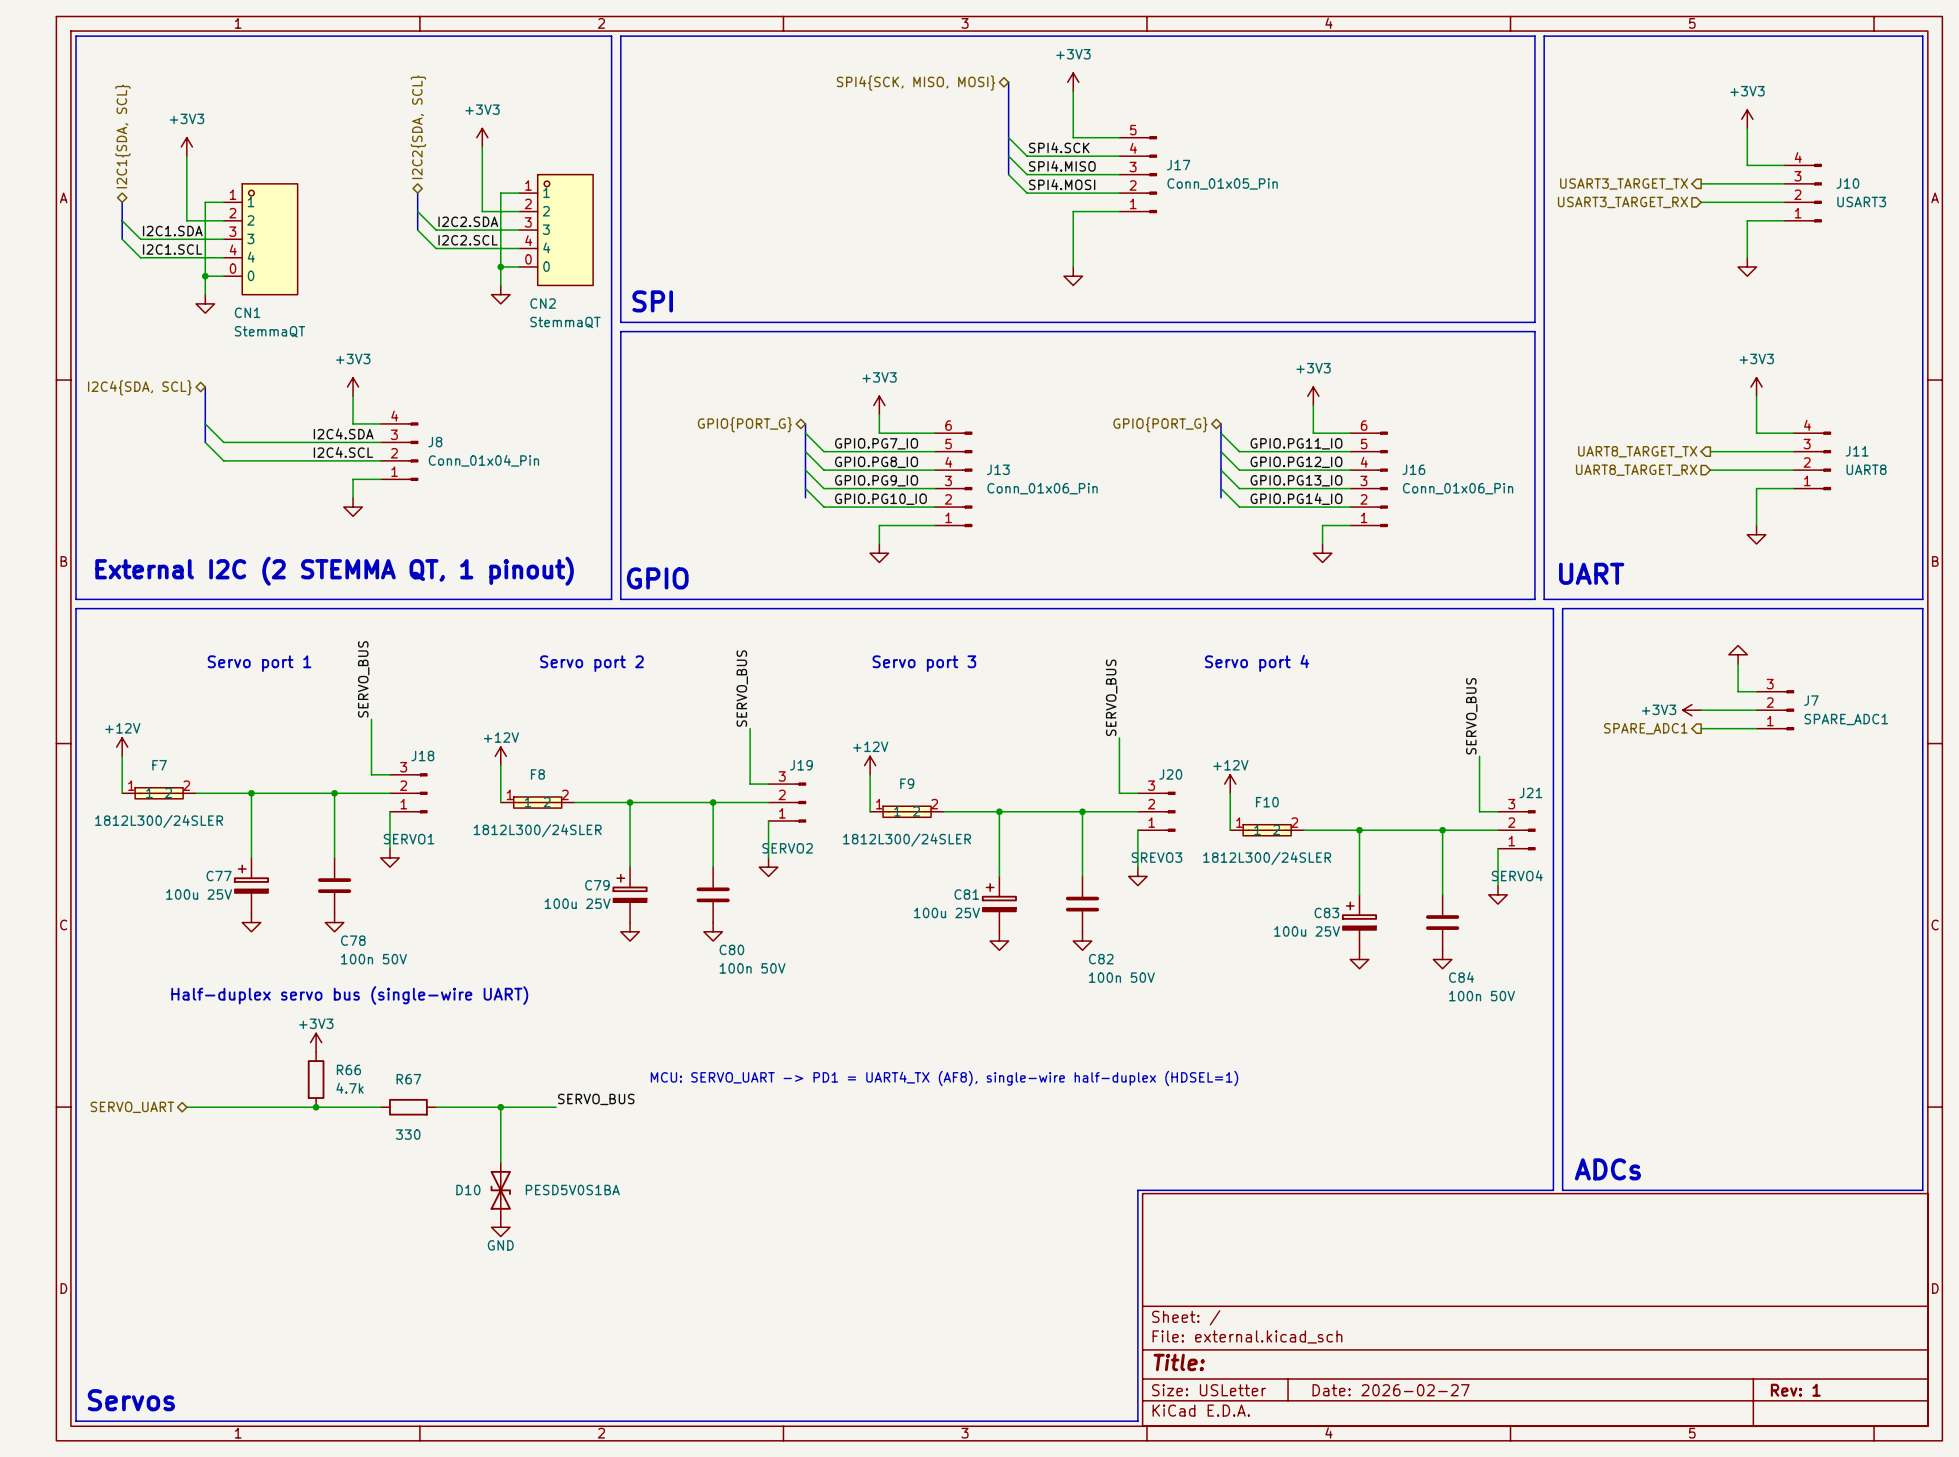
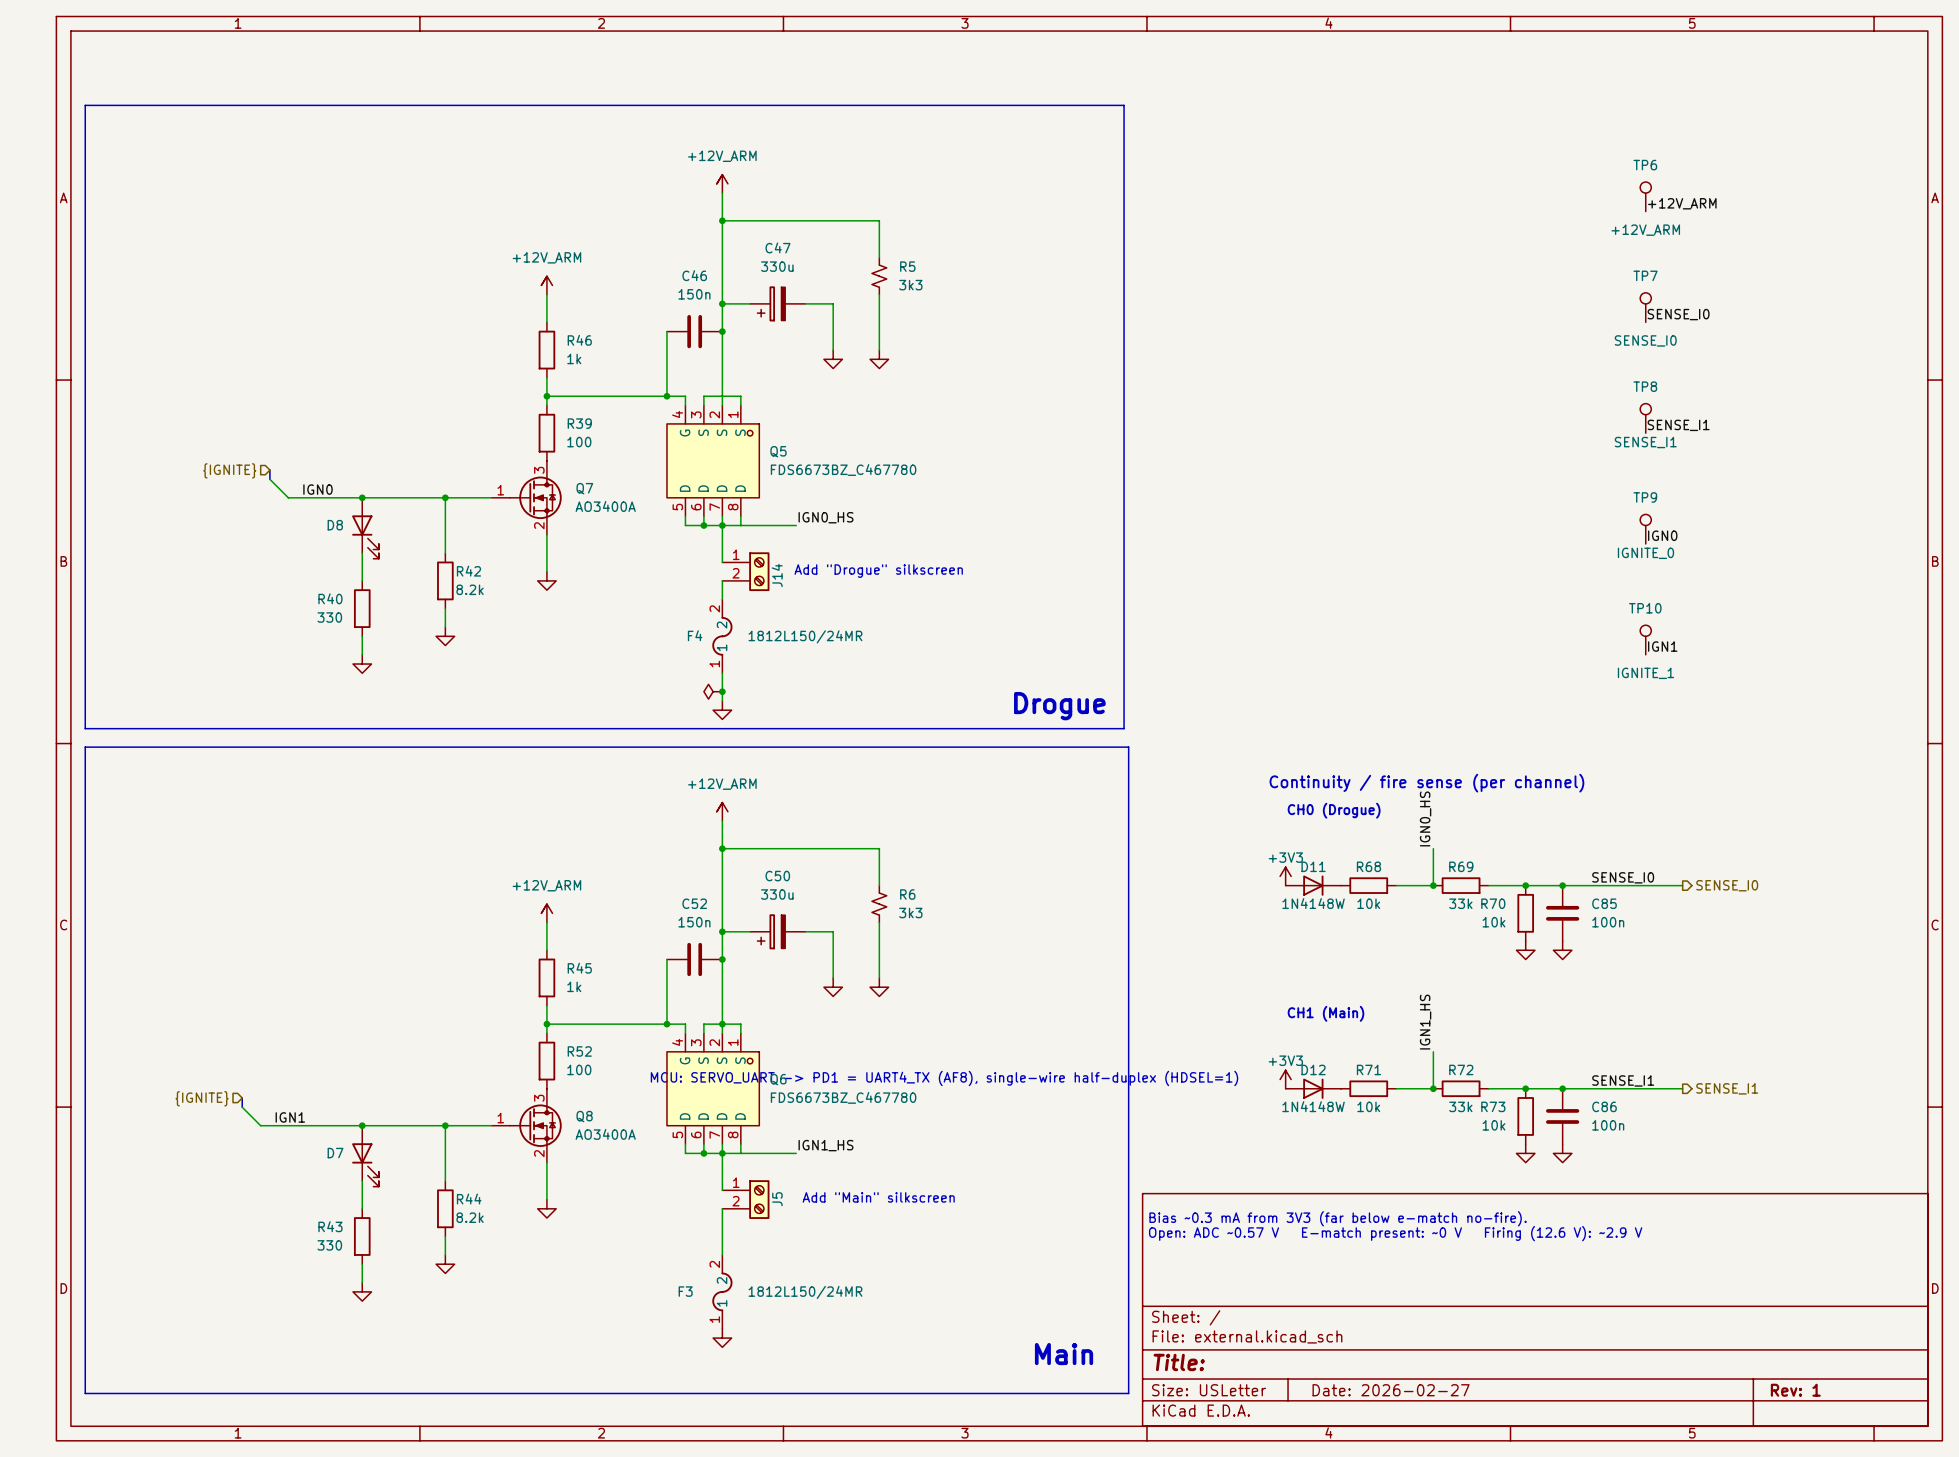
line: (76, 36) (611, 36) (611, 599) (76, 599) (76, 36) -> none
line: (620, 36) (620, 322) (1534, 322) (1534, 36) (620, 36) -> none
line: (1544, 36) (1922, 36) (1922, 599) (1544, 599) (1544, 36) -> none
bus: (1008, 82) (1008, 174) -> none
power symbol: +3V3 (1073, 82) -> none
hierarchical label: SPI4{SCK, MISO, MOSI} (915, 83) -> none
wire: (1073, 91) (1073, 137) (1119, 137) -> none
line: none -> (85, 105) (1124, 105) (1124, 728) (85, 728) (85, 105)
power symbol: +3V3 (1747, 119) -> none
hierarchical label: I2C2{SDA, SCL} (418, 127) -> none
wire: (1747, 128) (1747, 165) (1784, 165) -> none
hierarchical label: I2C1{SDA, SCL} (122, 136) -> none
power symbol: +3V3 (482, 137) -> none
wire: (1008, 137) (1027, 156) (1119, 156) -> none
power symbol: +3V3 (186, 146) -> none
wire: (482, 146) (482, 211) (519, 211) -> none
label: SPI4.SCK (1059, 147) -> none
wire: (186, 156) (186, 220) (223, 220) -> none
wire: (1008, 156) (1027, 174) (1119, 174) -> none
label: SPI4.MISO (1062, 166) -> none
wire: (1008, 174) (1027, 193) (1119, 193) -> none
J17: Conn_01x05_Pin (1138, 174) -> none
power symbol: none -> +12V_ARM (722, 183)
hierarchical label: USART3_TARGET_TX (1624, 183) -> none
wire: (1701, 183) (1784, 183) -> none
label: SPI4.MOSI (1062, 184) -> none
bus: (417, 193) (417, 230) -> none
wire: (519, 193) (500, 193) (500, 285) -> none
wire: none -> (722, 193) (722, 405)
J10: USART3 (1802, 193) -> none
TP6: none -> +12V_ARM (1645, 196)
bus: (122, 202) (122, 239) -> none
wire: (223, 202) (205, 202) (205, 294) -> none
hierarchical label: USART3_TARGET_RX (1622, 202) -> none
wire: (1701, 202) (1784, 202) -> none
label: none -> +12V_ARM (1682, 203)
wire: (417, 211) (436, 230) (519, 230) -> none
wire: (1119, 211) (1073, 211) (1073, 266) -> none
wire: (122, 220) (140, 239) (223, 239) -> none
wire: none -> (722, 220) (879, 220) (879, 257)
junction: none -> (722, 220)
wire: (1784, 220) (1747, 220) (1747, 257) -> none
label: I2C2.SDA (468, 221) -> none
wire: (417, 230) (436, 248) (519, 248) -> none
CN2: StemmaQT (556, 230) -> none
label: I2C1.SDA (172, 231) -> none
wire: (122, 239) (140, 257) (223, 257) -> none
CN1: StemmaQT (260, 239) -> none
label: I2C2.SCL (468, 240) -> none
label: I2C1.SCL (172, 249) -> none
wire: (500, 266) (519, 266) -> none
junction: (500, 266) -> none
power symbol: (1747, 266) -> none
wire: (205, 276) (223, 276) -> none
junction: (205, 276) -> none
R5: none -> 3k3 (879, 276)
power symbol: (1073, 276) -> none
power symbol: none -> +12V_ARM (546, 285)
power symbol: (500, 294) -> none
wire: none -> (546, 294) (546, 322)
wire: none -> (879, 294) (879, 350)
text: SPI (652, 301) -> none
power symbol: (205, 303) -> none
wire: none -> (722, 303) (750, 303)
junction: none -> (722, 303)
C47: none -> 330u (777, 303)
wire: none -> (805, 303) (833, 303) (833, 350)
TP7: none -> SENSE_I0 (1645, 307)
label: none -> SENSE_I0 (1678, 314)
line: (620, 331) (1534, 331) (1534, 599) (620, 599) (620, 331) -> none
wire: none -> (666, 331) (666, 396)
C46: none -> 150n (694, 331)
junction: none -> (722, 331)
R46: none -> 1k (546, 350)
power symbol: none -> (833, 359)
power symbol: none -> (879, 359)
wire: none -> (546, 377) (546, 405)
hierarchical label: I2C4{SDA, SCL} (139, 387) -> none
bus: (205, 387) (205, 442) -> none
power symbol: +3V3 (353, 387) -> none
power symbol: +3V3 (1756, 387) -> none
wire: (353, 396) (353, 423) (380, 423) -> none
wire: none -> (546, 396) (685, 396) (685, 405)
junction: none -> (546, 396)
junction: none -> (666, 396)
power symbol: +3V3 (1313, 396) -> none
wire: (1756, 396) (1756, 433) (1793, 433) -> none
wire: none -> (703, 405) (703, 396) (740, 396) (740, 405)
power symbol: +3V3 (879, 405) -> none
wire: (1313, 405) (1313, 433) (1350, 433) -> none
wire: (879, 414) (879, 433) (934, 433) -> none
TP8: none -> SENSE_I1 (1645, 418)
wire: (205, 423) (223, 442) (380, 442) -> none
bus: (805, 423) (805, 497) -> none
bus: (1220, 423) (1220, 497) -> none
hierarchical label: GPIO{PORT_G} (744, 424) -> none
hierarchical label: GPIO{PORT_G} (1160, 424) -> none
label: none -> SENSE_I1 (1678, 425)
label: I2C4.SDA (343, 433) -> none
R39: none -> 100 (546, 433)
wire: (805, 433) (823, 451) (934, 451) -> none
wire: (1220, 433) (1239, 451) (1350, 451) -> none
wire: (205, 442) (223, 460) (380, 460) -> none
label: GPIO.PG7_IO (876, 443) -> none
label: GPIO.PG11_IO (1296, 443) -> none
J8: Conn_01x04_Pin (399, 451) -> none
wire: (805, 451) (823, 470) (934, 470) -> none
wire: (1220, 451) (1239, 470) (1350, 470) -> none
hierarchical label: UART8_TARGET_TX (1637, 451) -> none
wire: (1710, 451) (1793, 451) -> none
label: I2C4.SCL (343, 452) -> none
Q5: none -> FDS6673BZ_C467780 (713, 460)
J11: UART8 (1812, 460) -> none
label: GPIO.PG8_IO (876, 462) -> none
label: GPIO.PG12_IO (1296, 462) -> none
hierarchical label: none -> {IGNITE} (229, 470)
bus: none -> (269, 470) (269, 479)
wire: (805, 470) (823, 488) (934, 488) -> none
wire: (1220, 470) (1239, 488) (1350, 488) -> none
hierarchical label: UART8_TARGET_RX (1636, 470) -> none
wire: (1710, 470) (1793, 470) -> none
wire: none -> (269, 479) (288, 497) (491, 497)
wire: (380, 479) (353, 479) (353, 497) -> none
J13: Conn_01x06_Pin (953, 479) -> none
J16: Conn_01x06_Pin (1369, 479) -> none
label: GPIO.PG9_IO (876, 480) -> none
label: GPIO.PG13_IO (1296, 480) -> none
wire: (805, 488) (823, 507) (934, 507) -> none
wire: (1220, 488) (1239, 507) (1350, 507) -> none
wire: (1793, 488) (1756, 488) (1756, 525) -> none
label: none -> IGN0 (318, 489)
junction: none -> (362, 497)
wire: none -> (445, 497) (445, 553)
junction: none -> (445, 497)
Q7: none -> AO3400A (526, 497)
label: GPIO.PG10_IO (880, 499) -> none
label: GPIO.PG14_IO (1296, 499) -> none
power symbol: (353, 507) -> none
wire: none -> (685, 516) (685, 525) (796, 525)
wire: none -> (703, 516) (703, 525)
wire: none -> (722, 516) (722, 562)
wire: none -> (740, 516) (740, 525)
label: none -> IGN0_HS (825, 517)
junction: none -> (703, 525)
junction: none -> (722, 525)
wire: (934, 525) (879, 525) (879, 543) -> none
wire: (1350, 525) (1322, 525) (1322, 543) -> none
D8: none -> (365, 528)
TP9: none -> IGNITE_0 (1645, 529)
wire: none -> (546, 534) (546, 571)
power symbol: (1756, 534) -> none
label: none -> IGN0 (1662, 535)
wire: none -> (362, 553) (362, 580)
power symbol: (879, 553) -> none
power symbol: (1322, 553) -> none
text: External I2C (2 STEMMA QT, 1 pinout) (334, 571) -> none
J14: none -> (745, 571)
text: none -> Add "Drogue" silkscreen (878, 571)
text: UART (1591, 573) -> none
text: GPIO (657, 578) -> none
R42: none -> 8.2k (445, 580)
power symbol: none -> (546, 580)
wire: none -> (722, 580) (722, 599)
line: (76, 608) (1553, 608) (1553, 1190) (1137, 1190) (1137, 1421) (76, 1421) (76, 608) -> (85, 747) (85, 1393) (1128, 1393) (1128, 747) (85, 747)
R40: none -> 330 (362, 608)
wire: none -> (445, 608) (445, 627)
line: (1562, 608) (1922, 608) (1922, 1190) (1562, 1190) (1562, 608) -> none
wire: none -> (362, 636) (362, 654)
power symbol: none -> (445, 636)
F4: none -> 1812L150/24MR (722, 636)
TP10: none -> IGNITE_1 (1645, 640)
label: none -> IGN1 (1662, 646)
power symbol: (1738, 654) -> none
text: Servo port 1 (259, 663) -> none
text: Servo port 2 (591, 663) -> none
text: Servo port 3 (924, 663) -> none
text: Servo port 4 (1257, 663) -> none
power symbol: none -> (362, 664)
wire: (1738, 664) (1738, 691) (1756, 691) -> none
wire: none -> (722, 673) (722, 700)
label: SERVO_BUS (363, 679) -> none
label: SERVO_BUS (742, 688) -> none
power symbol: none -> (713, 691)
junction: none -> (722, 691)
label: SERVO_BUS (1111, 697) -> none
text: none -> Drogue (1059, 706)
power symbol: none -> (722, 710)
power symbol: +3V3 (1691, 710) -> none
wire: (1701, 710) (1756, 710) -> none
J7: SPARE_ADC1 (1775, 710) -> none
label: SERVO_BUS (1471, 716) -> none
wire: (371, 719) (371, 774) (389, 774) -> none
wire: (750, 728) (750, 784) (768, 784) -> none
hierarchical label: SPARE_ADC1 (1645, 728) -> none
wire: (1701, 728) (1756, 728) -> none
wire: (1119, 737) (1119, 793) (1137, 793) -> none
power symbol: +12V (122, 747) -> none
wire: (122, 756) (122, 793) -> none
power symbol: +12V (500, 756) -> none
wire: (1479, 756) (1479, 811) (1498, 811) -> none
wire: (500, 765) (500, 802) -> none
power symbol: +12V (870, 765) -> none
wire: (870, 774) (870, 811) -> none
text: none -> Continuity / fire sense (per channel) (1426, 783)
power symbol: +12V (1230, 784) -> none
F7: 1812L300/24SLER (159, 793) -> none
wire: (196, 793) (389, 793) -> none
wire: (251, 793) (251, 857) -> none
junction: (251, 793) -> none
wire: (334, 793) (334, 857) -> none
junction: (334, 793) -> none
J18: SERVO1 (408, 793) -> none
wire: (1230, 793) (1230, 830) -> none
F8: 1812L300/24SLER (537, 802) -> none
wire: (574, 802) (768, 802) -> none
wire: (630, 802) (630, 867) -> (666, 959) (666, 1024)
junction: (630, 802) -> none
wire: (713, 802) (713, 867) -> none
junction: (713, 802) -> none
J19: SERVO2 (787, 802) -> none
text: none -> CH0 (Drogue) (1334, 810)
wire: (389, 811) (389, 848) -> none
power symbol: none -> +12V_ARM (722, 811)
F9: 1812L300/24SLER (907, 811) -> none
wire: (943, 811) (1137, 811) -> none
wire: (999, 811) (999, 876) -> none
junction: (999, 811) -> none
wire: (1082, 811) (1082, 876) -> none
junction: (1082, 811) -> none
J20: SREVO3 (1156, 811) -> none
label: none -> IGN0_HS (1425, 818)
wire: none -> (722, 820) (722, 1033)
wire: (768, 820) (768, 857) -> none
wire: (1137, 830) (1137, 867) -> none
F10: 1812L300/24SLER (1267, 830) -> none
wire: (1304, 830) (1498, 830) -> none
wire: (1359, 830) (1359, 894) -> none
junction: (1359, 830) -> none
wire: (1442, 830) (1442, 894) -> none
junction: (1442, 830) -> none
J21: SERVO4 (1516, 830) -> none
wire: none -> (722, 848) (879, 848) (879, 885)
junction: none -> (722, 848)
wire: none -> (1433, 848) (1433, 885) (1396, 885)
wire: (1498, 848) (1498, 885) -> none
power symbol: (389, 857) -> none
power symbol: (768, 867) -> none
power symbol: (1137, 876) -> none
power symbol: none -> +3V3 (1285, 876)
label: none -> SENSE_I0 (1623, 877)
C77: 100u 25V (251, 885) -> none
C78: 100n 50V (334, 885) -> none
D11: none -> 1N4148W (1313, 885)
R68: none -> 10k (1368, 885)
junction: none -> (1433, 885)
R69: none -> 33k (1461, 885)
wire: none -> (1488, 885) (1682, 885)
junction: none -> (1525, 885)
junction: none -> (1562, 885)
hierarchical label: none -> SENSE_I0 (1727, 885)
C79: 100u 25V (630, 894) -> none
C80: 100n 50V (713, 894) -> none
power symbol: (1498, 894) -> none
R6: none -> 3k3 (879, 904)
C81: 100u 25V (999, 904) -> none
C82: 100n 50V (1082, 904) -> none
power symbol: none -> +12V_ARM (546, 913)
R70: none -> 10k (1525, 913)
C85: none -> 100n (1562, 913)
power symbol: (251, 922) -> none
power symbol: (334, 922) -> none
wire: none -> (546, 922) (546, 950)
wire: none -> (879, 922) (879, 977)
C83: 100u 25V (1359, 922) -> none
C84: 100n 50V (1442, 922) -> none
power symbol: (630, 931) -> none
power symbol: (713, 931) -> none
wire: none -> (722, 931) (750, 931)
junction: none -> (722, 931)
C50: none -> 330u (777, 931)
wire: none -> (805, 931) (833, 931) (833, 977)
power symbol: (999, 941) -> none
power symbol: (1082, 941) -> none
power symbol: none -> (1525, 950)
power symbol: none -> (1562, 950)
C52: none -> 150n (694, 959)
junction: none -> (722, 959)
power symbol: (1359, 959) -> none
power symbol: (1442, 959) -> none
R45: none -> 1k (546, 977)
power symbol: none -> (833, 987)
power symbol: none -> (879, 987)
text: Half-duplex servo bus (single-wire UART) (349, 995) -> none
wire: none -> (546, 1005) (546, 1033)
text: none -> CH1 (Main) (1325, 1013)
label: none -> IGN1_HS (1425, 1022)
wire: none -> (546, 1024) (685, 1024) (685, 1033)
junction: none -> (546, 1024)
junction: none -> (666, 1024)
junction: none -> (722, 1024)
wire: none -> (703, 1033) (703, 1024) (740, 1024) (740, 1033)
power symbol: +3V3 (316, 1042) -> none
wire: none -> (1433, 1051) (1433, 1088) (1396, 1088)
R52: none -> 100 (546, 1061)
R66: 4.7k (316, 1079) -> none
power symbol: none -> +3V3 (1285, 1079)
label: none -> SENSE_I1 (1623, 1080)
Q6: none -> FDS6673BZ_C467780 (713, 1088)
D12: none -> 1N4148W (1313, 1088)
R71: none -> 10k (1368, 1088)
junction: none -> (1433, 1088)
R72: none -> 33k (1461, 1088)
wire: none -> (1488, 1088) (1682, 1088)
junction: none -> (1525, 1088)
junction: none -> (1562, 1088)
hierarchical label: none -> SENSE_I1 (1727, 1088)
hierarchical label: none -> {IGNITE} (202, 1098)
bus: none -> (242, 1098) (242, 1107)
label: SERVO_BUS (596, 1099) -> none
hierarchical label: SERVO_UART (132, 1107) -> none
wire: (186, 1107) (380, 1107) -> none
wire: none -> (242, 1107) (260, 1125) (491, 1125)
junction: (316, 1107) -> none
R67: 330 (408, 1107) -> none
wire: (436, 1107) (556, 1107) -> none
wire: (500, 1107) (500, 1162) -> (445, 1125) (445, 1181)
junction: (500, 1107) -> none
R73: none -> 10k (1525, 1116)
C86: none -> 100n (1562, 1116)
label: none -> IGN1 (290, 1117)
junction: none -> (362, 1125)
junction: none -> (445, 1125)
Q8: none -> AO3400A (526, 1125)
wire: none -> (685, 1144) (685, 1153) (796, 1153)
wire: none -> (703, 1144) (703, 1153)
wire: none -> (722, 1144) (722, 1190)
wire: none -> (740, 1144) (740, 1153)
label: none -> IGN1_HS (825, 1145)
junction: none -> (703, 1153)
junction: none -> (722, 1153)
power symbol: none -> (1525, 1153)
power symbol: none -> (1562, 1153)
D7: none -> (365, 1156)
wire: none -> (546, 1162) (546, 1199)
text: ADCs (1607, 1169) -> none
wire: none -> (362, 1181) (362, 1208)
D10: PESD5V0S1BA (500, 1190) -> none
text: none -> Add "Main" silkscreen (878, 1197)
J5: none -> (745, 1199)
R44: none -> 8.2k (445, 1208)
power symbol: none -> (546, 1208)
wire: none -> (722, 1208) (722, 1254)
text: none -> Bias ~0.3 mA from 3V3 (far below e-match no-fire). (1338, 1218)
power symbol: GND (500, 1227) -> none
text: none -> Open: ADC ~0.57 V E-match present: ~0 V Firing (12.6 V): ~2.9 V (1395, 1233)
R43: none -> 330 (362, 1236)
wire: none -> (445, 1236) (445, 1254)
wire: none -> (362, 1264) (362, 1282)
power symbol: none -> (445, 1264)
power symbol: none -> (362, 1291)
F3: none -> 1812L150/24MR (722, 1291)
power symbol: none -> (722, 1338)
text: none -> Main (1064, 1354)
text: Servos (131, 1400) -> none

